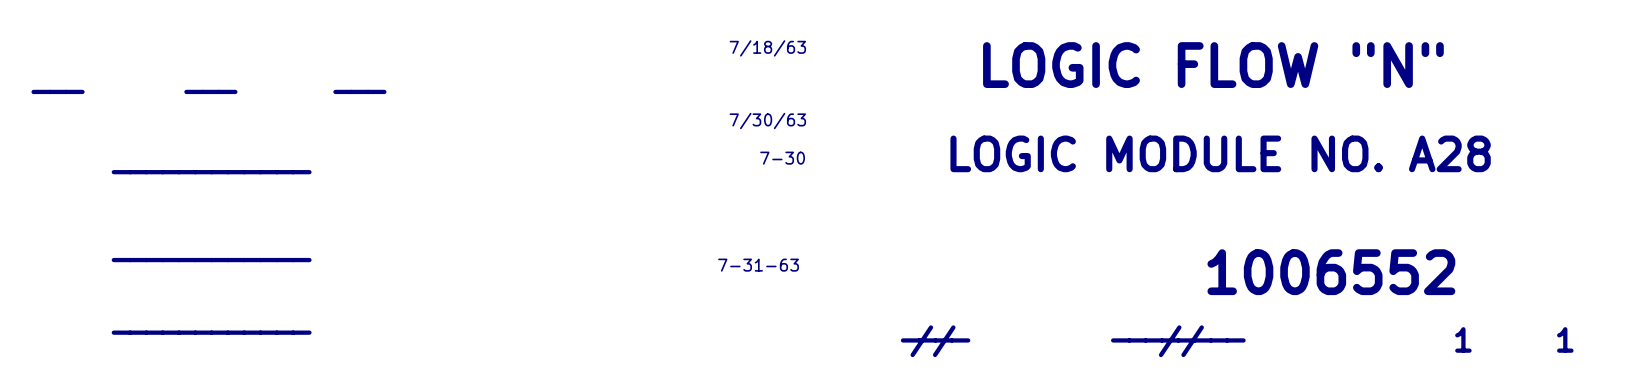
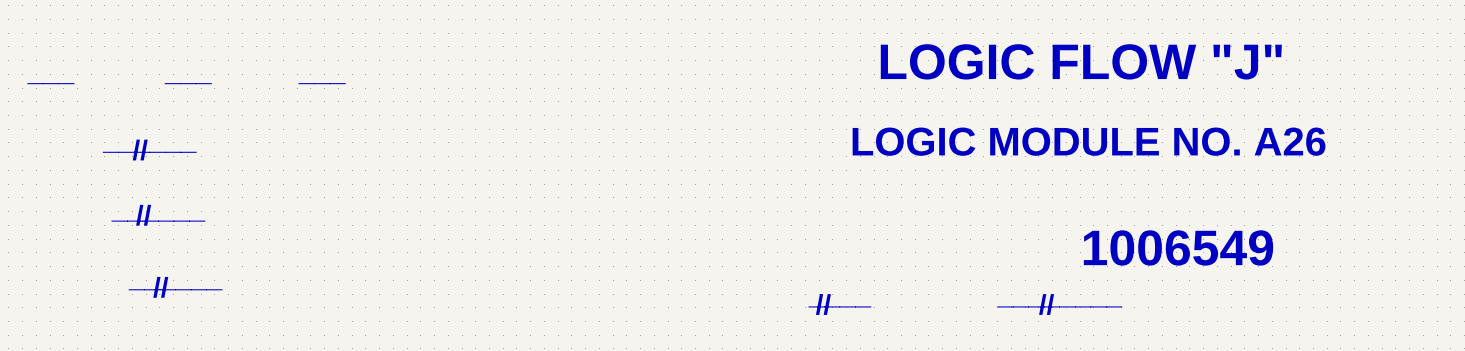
text: 7/18/63 (767, 48) -> none
text: LOGIC FLOW "N" (1213, 65) -> LOGIC FLOW "J" (1081, 61)
text: 7/30/63 (767, 121) -> none
text: LOGIC MODULE NO. A28 (1220, 153) -> LOGIC MODULE NO. A26 (1089, 141)
text: 7-30 (782, 158) -> none
text: none -> // (140, 150)
text: ____________ (211, 172) -> ______ (149, 152)
text: none -> // (143, 215)
text: ____________ (211, 260) -> ______ (158, 221)
text: 7-31-63 (758, 265) -> none
text: 1006552 (1331, 272) -> 1006549 (1178, 247)
text: none -> // (160, 287)
text: ____________ (211, 332) -> ______ (175, 289)
text: 1 1 (1514, 339) -> none

